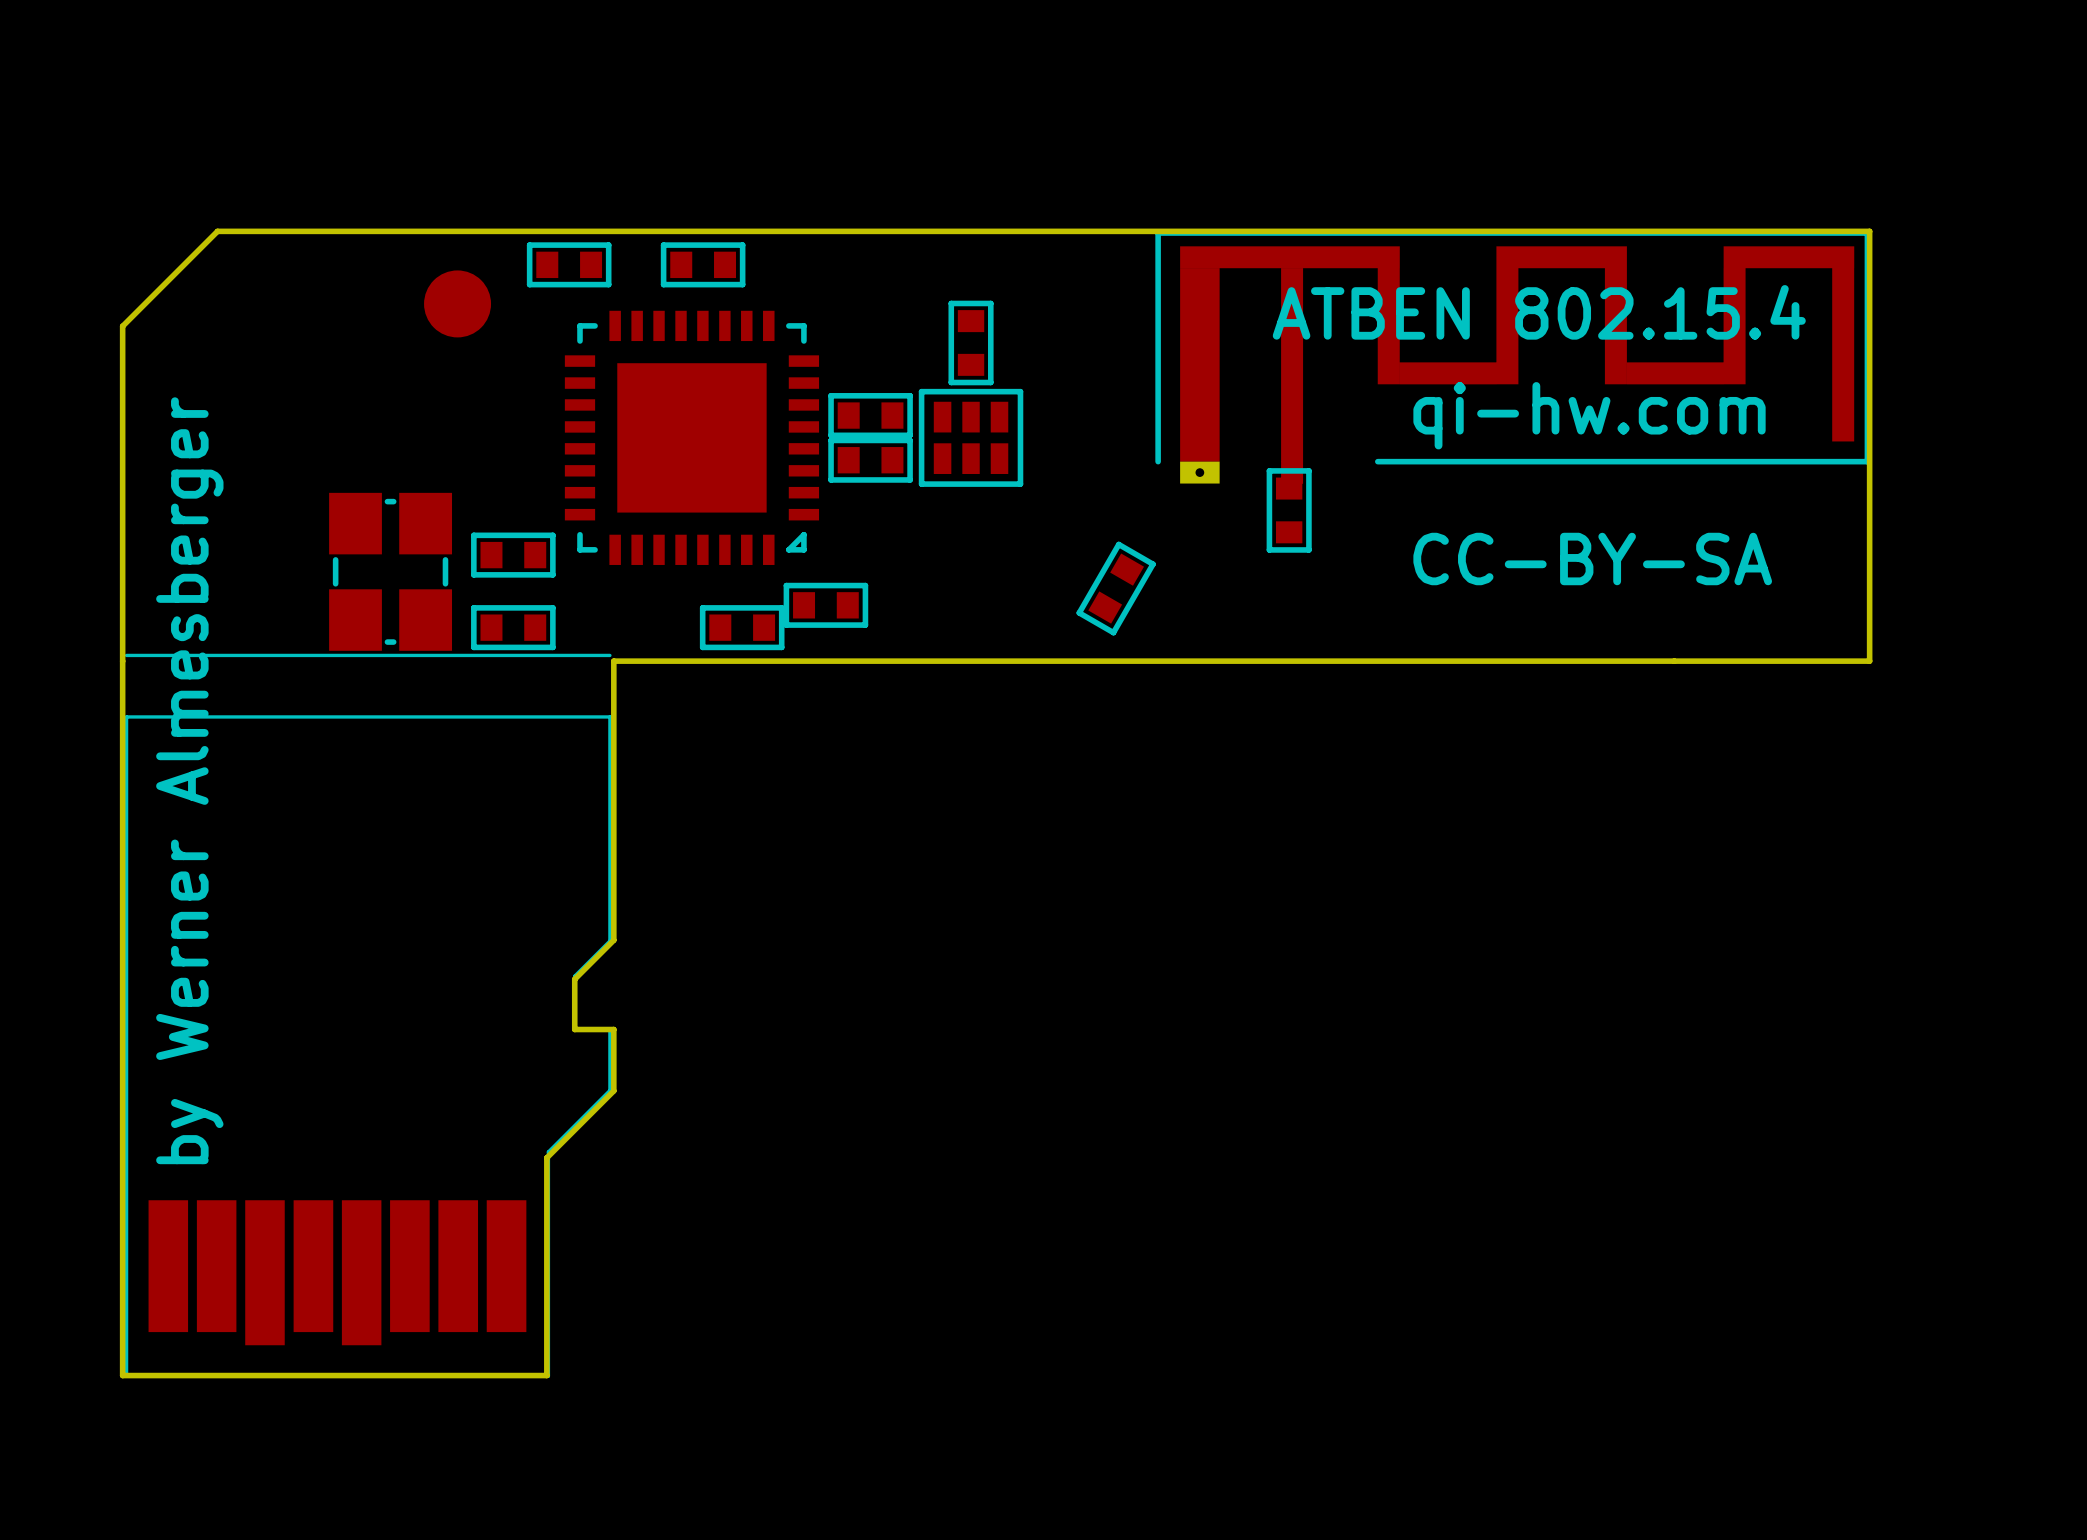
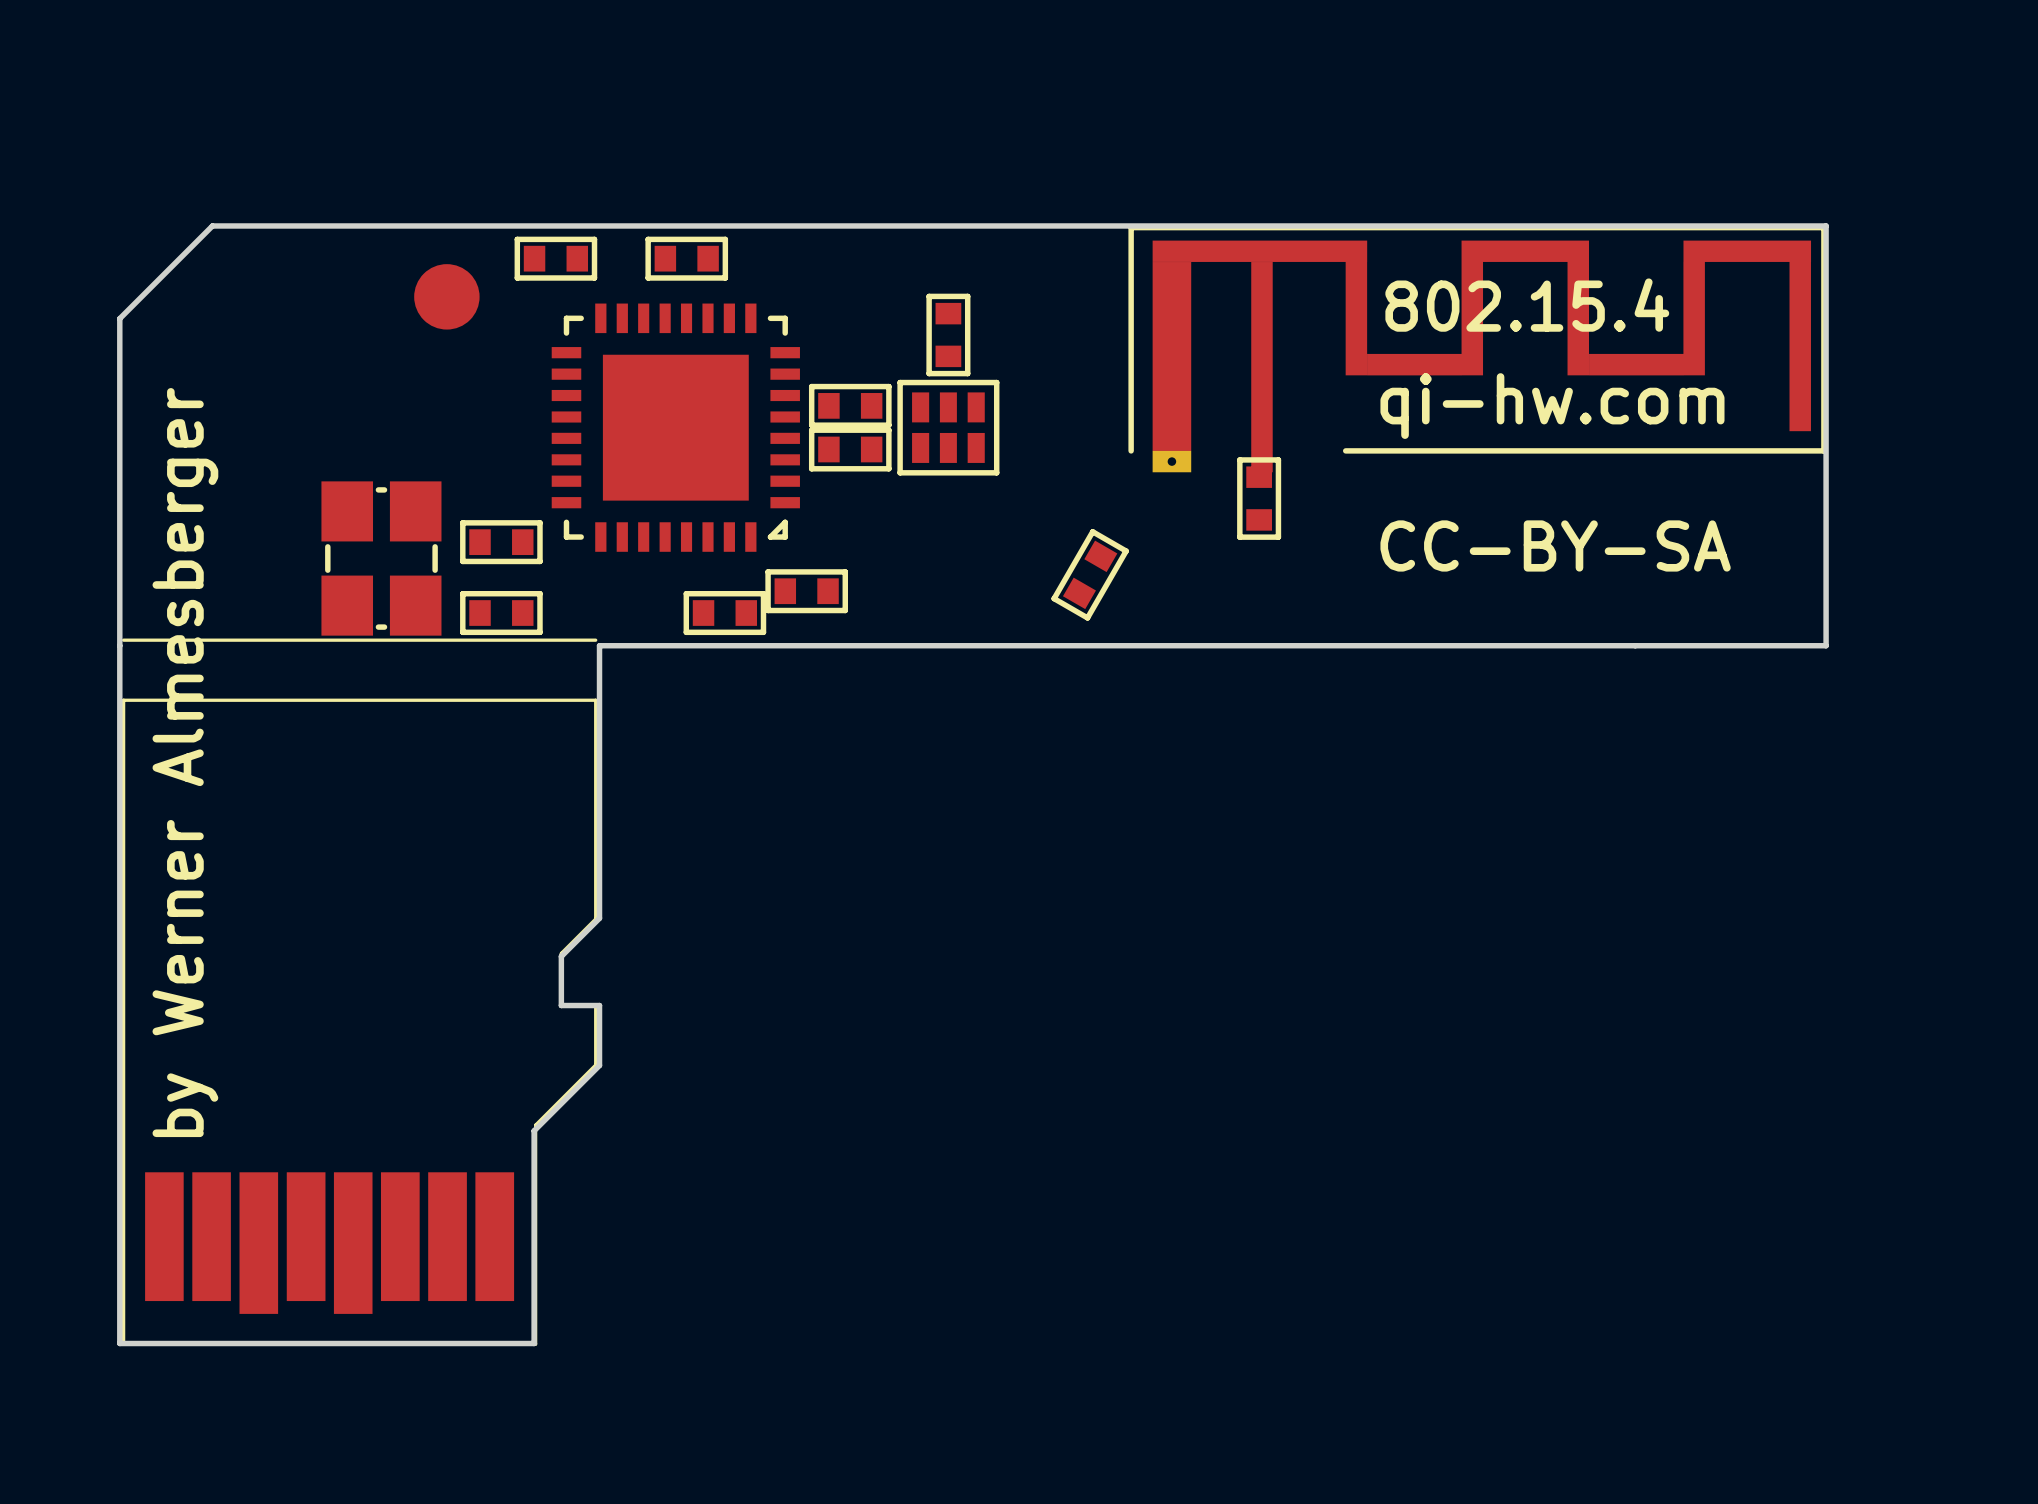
text: ATBEN 802.15.4 (1539, 312) -> 802.15.4 (1527, 305)

